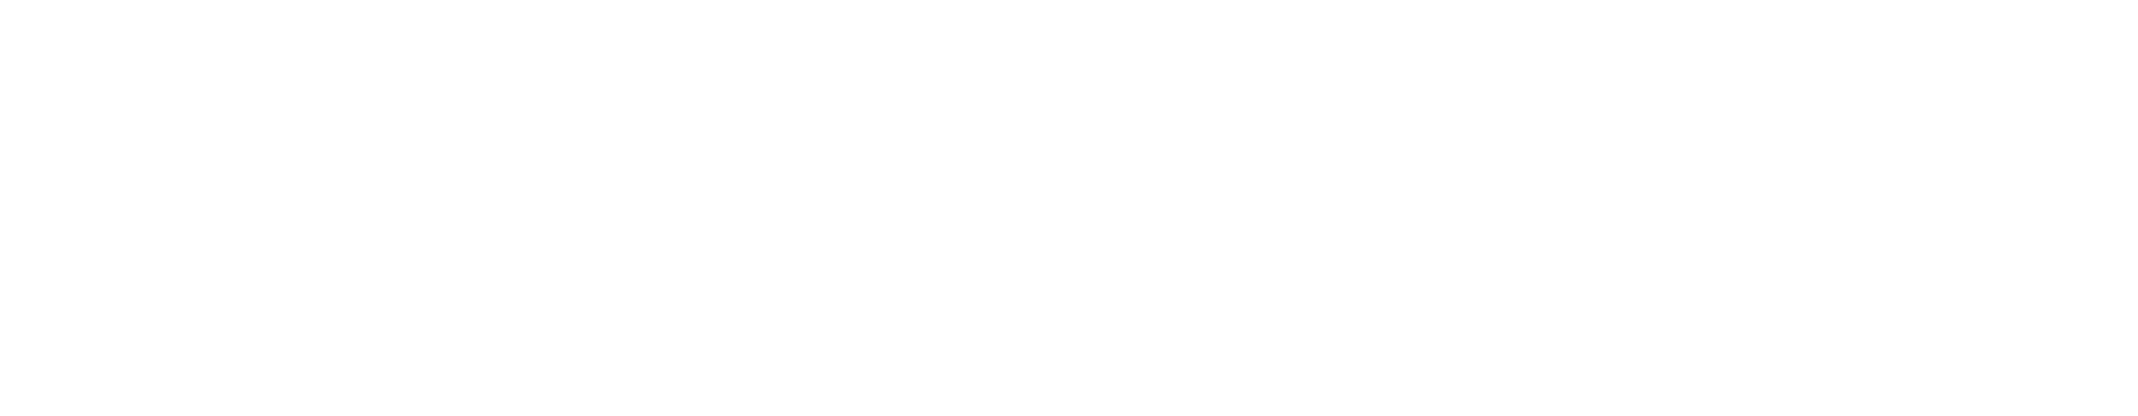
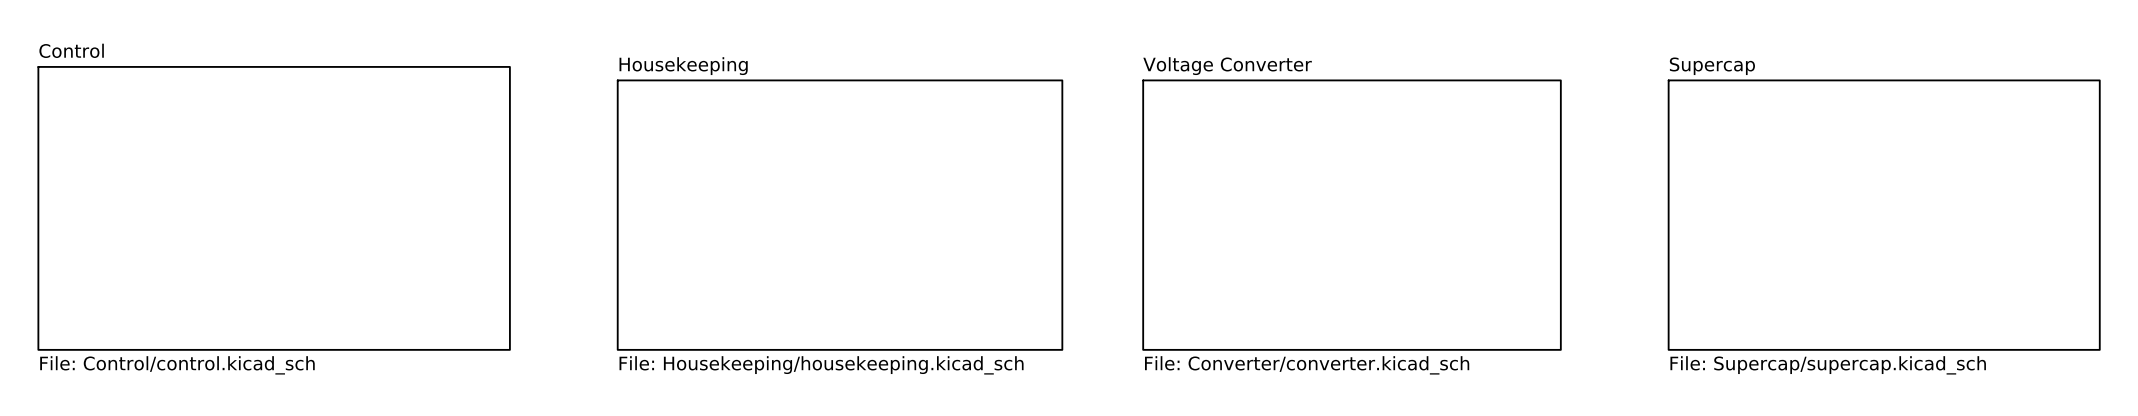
sheet Control: none -> File: Control/control.kicad_sch (274, 208)
sheet Housekeeping: none -> File: Housekeeping/housekeeping.kicad_sch (840, 215)
sheet Voltage Converter: none -> File: Converter/converter.kicad_sch (1352, 215)
sheet Supercap: none -> File: Supercap/supercap.kicad_sch (1884, 215)

